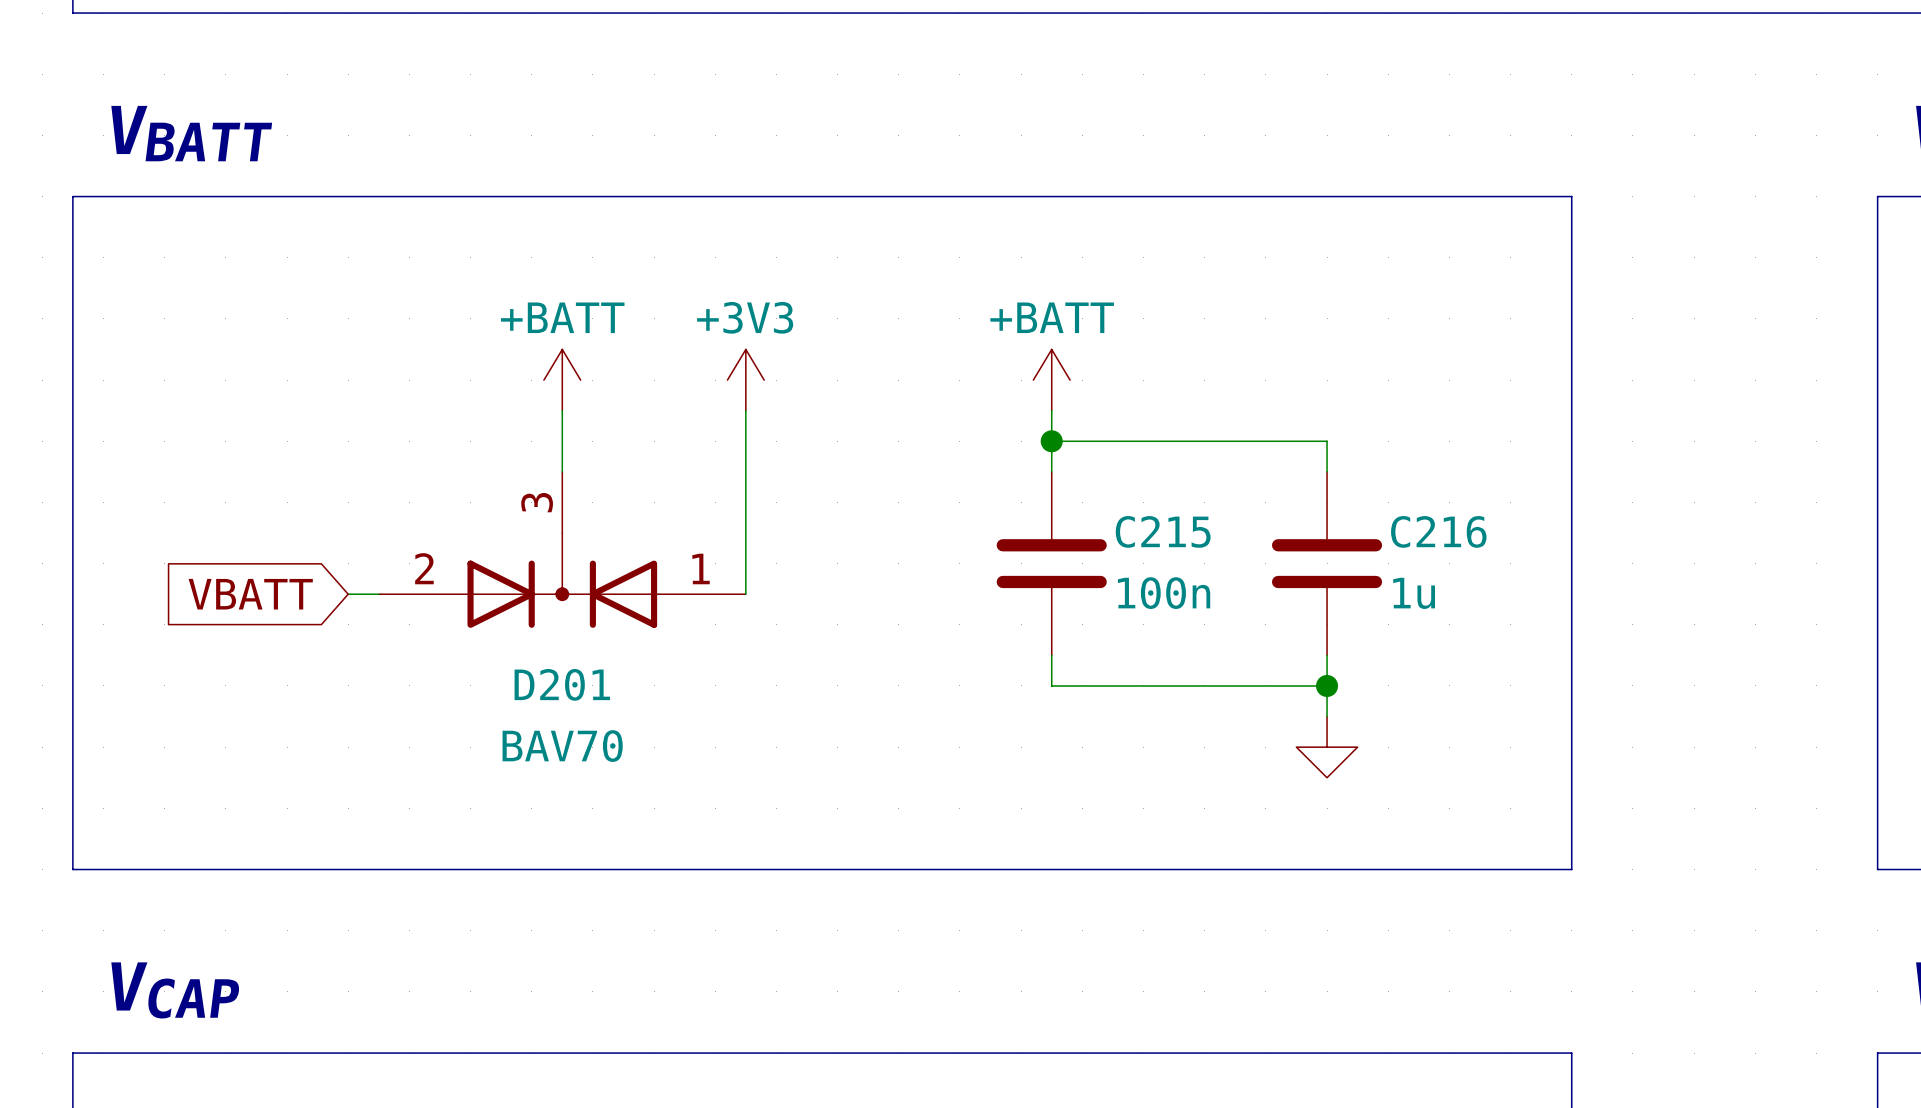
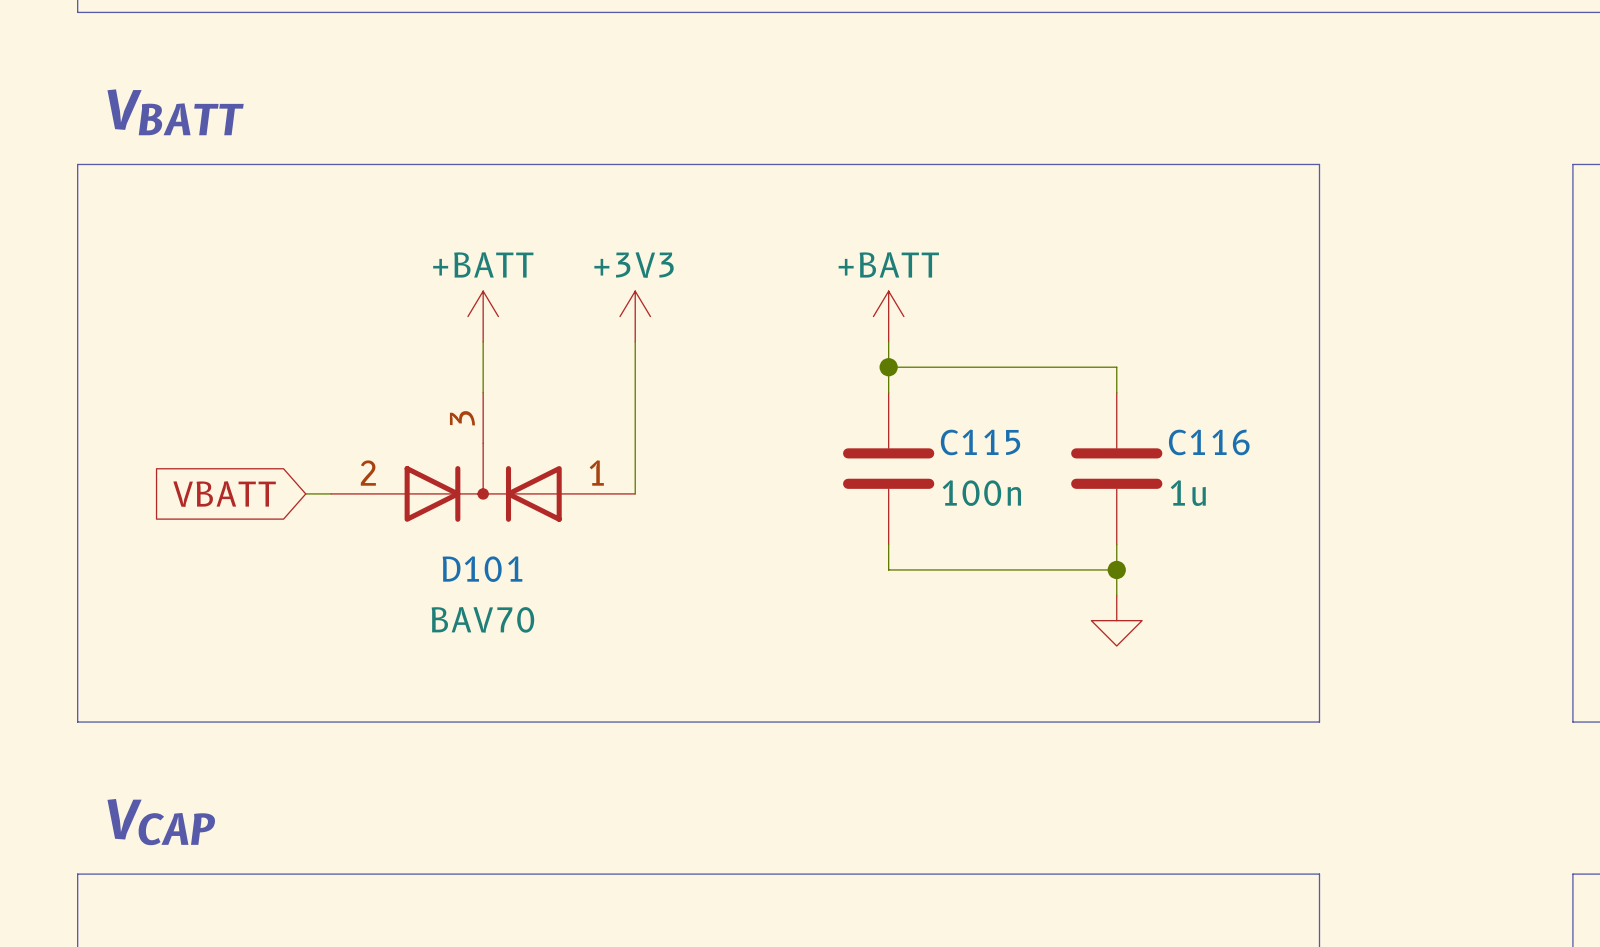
C215 name: C215 (1163, 531) -> C115 (980, 442)
C216 name: C216 (1438, 531) -> C116 (1209, 442)
D201 name: D201 (562, 684) -> D101 (482, 569)

